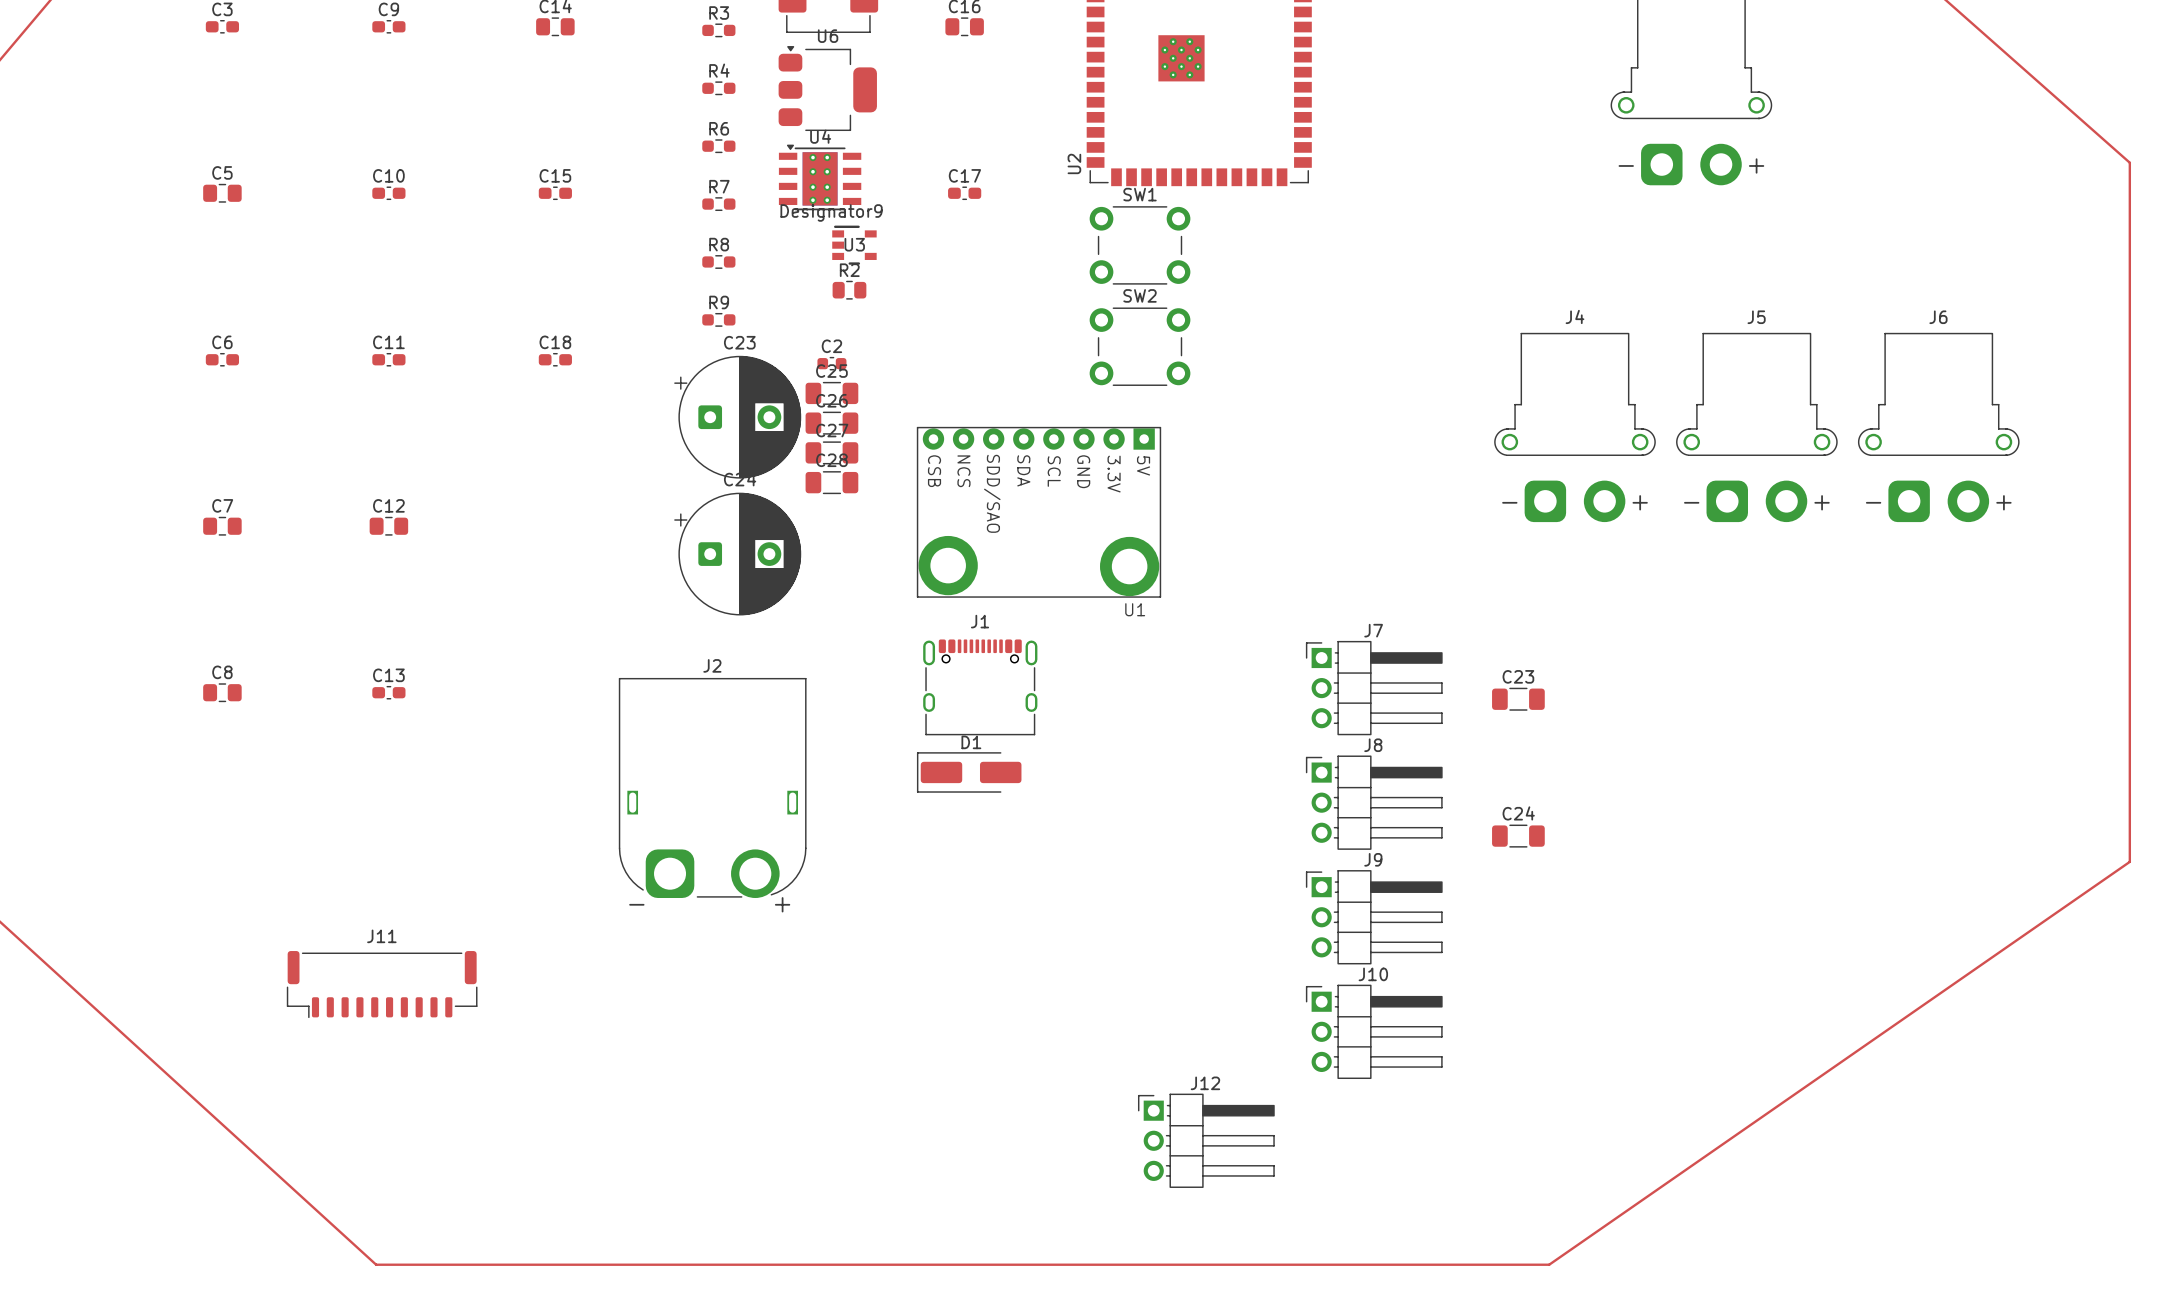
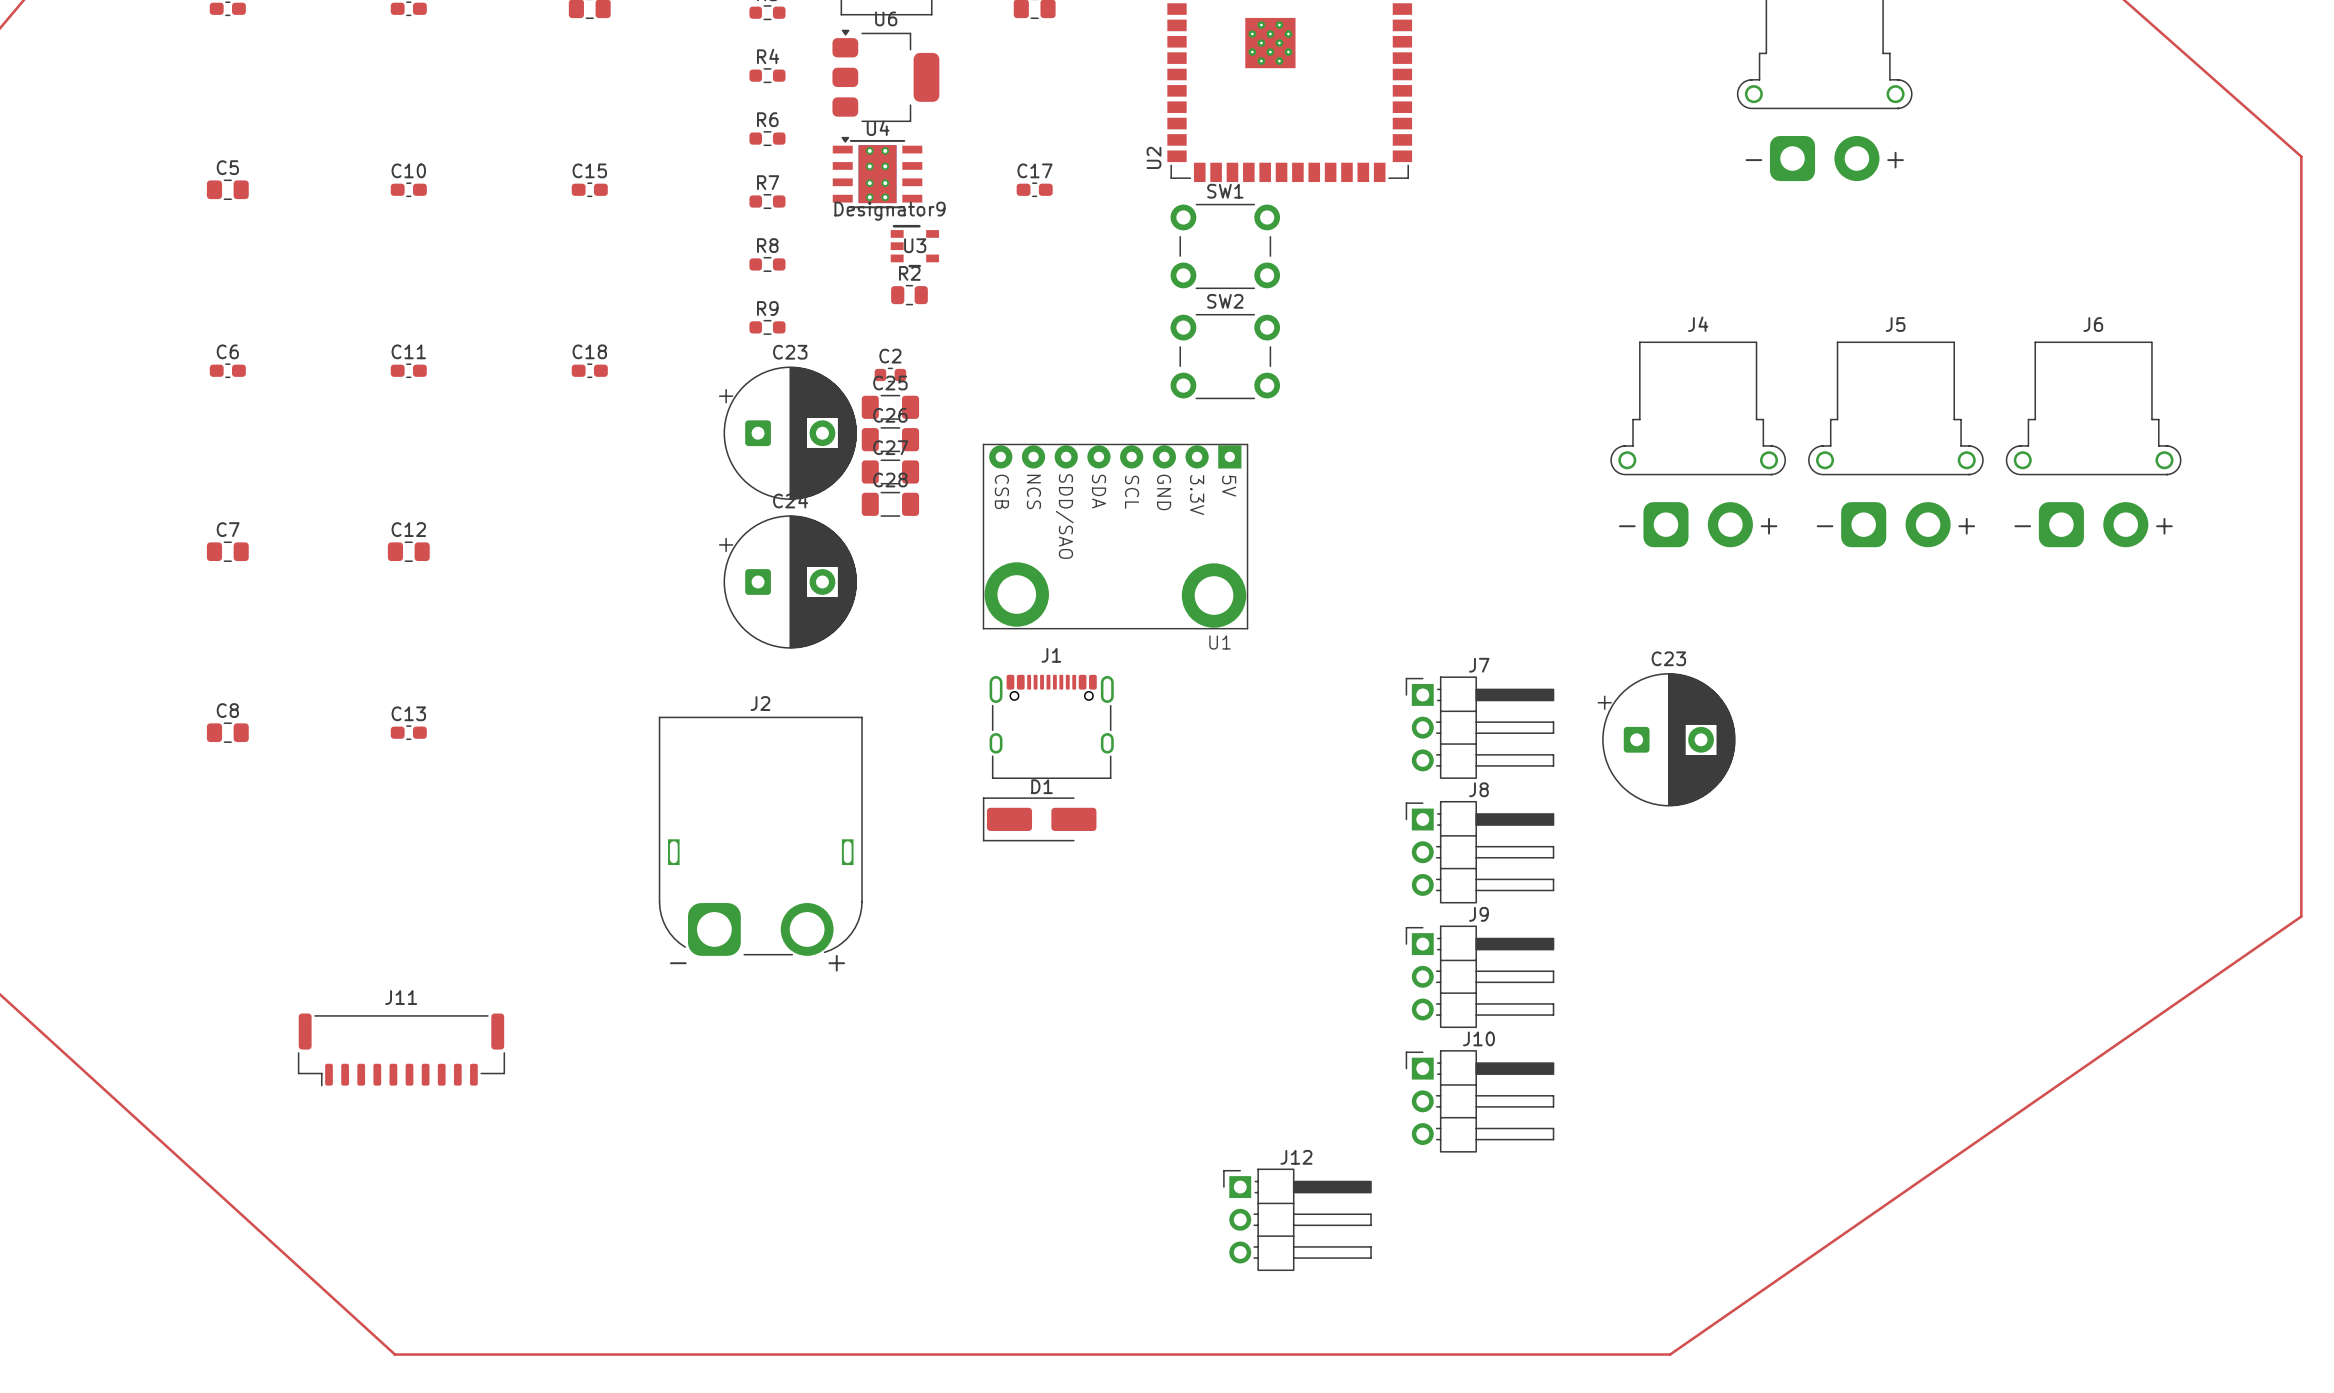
C23: (1518, 699) -> none
C23: none -> (1666, 739)
C24: (1518, 836) -> none

